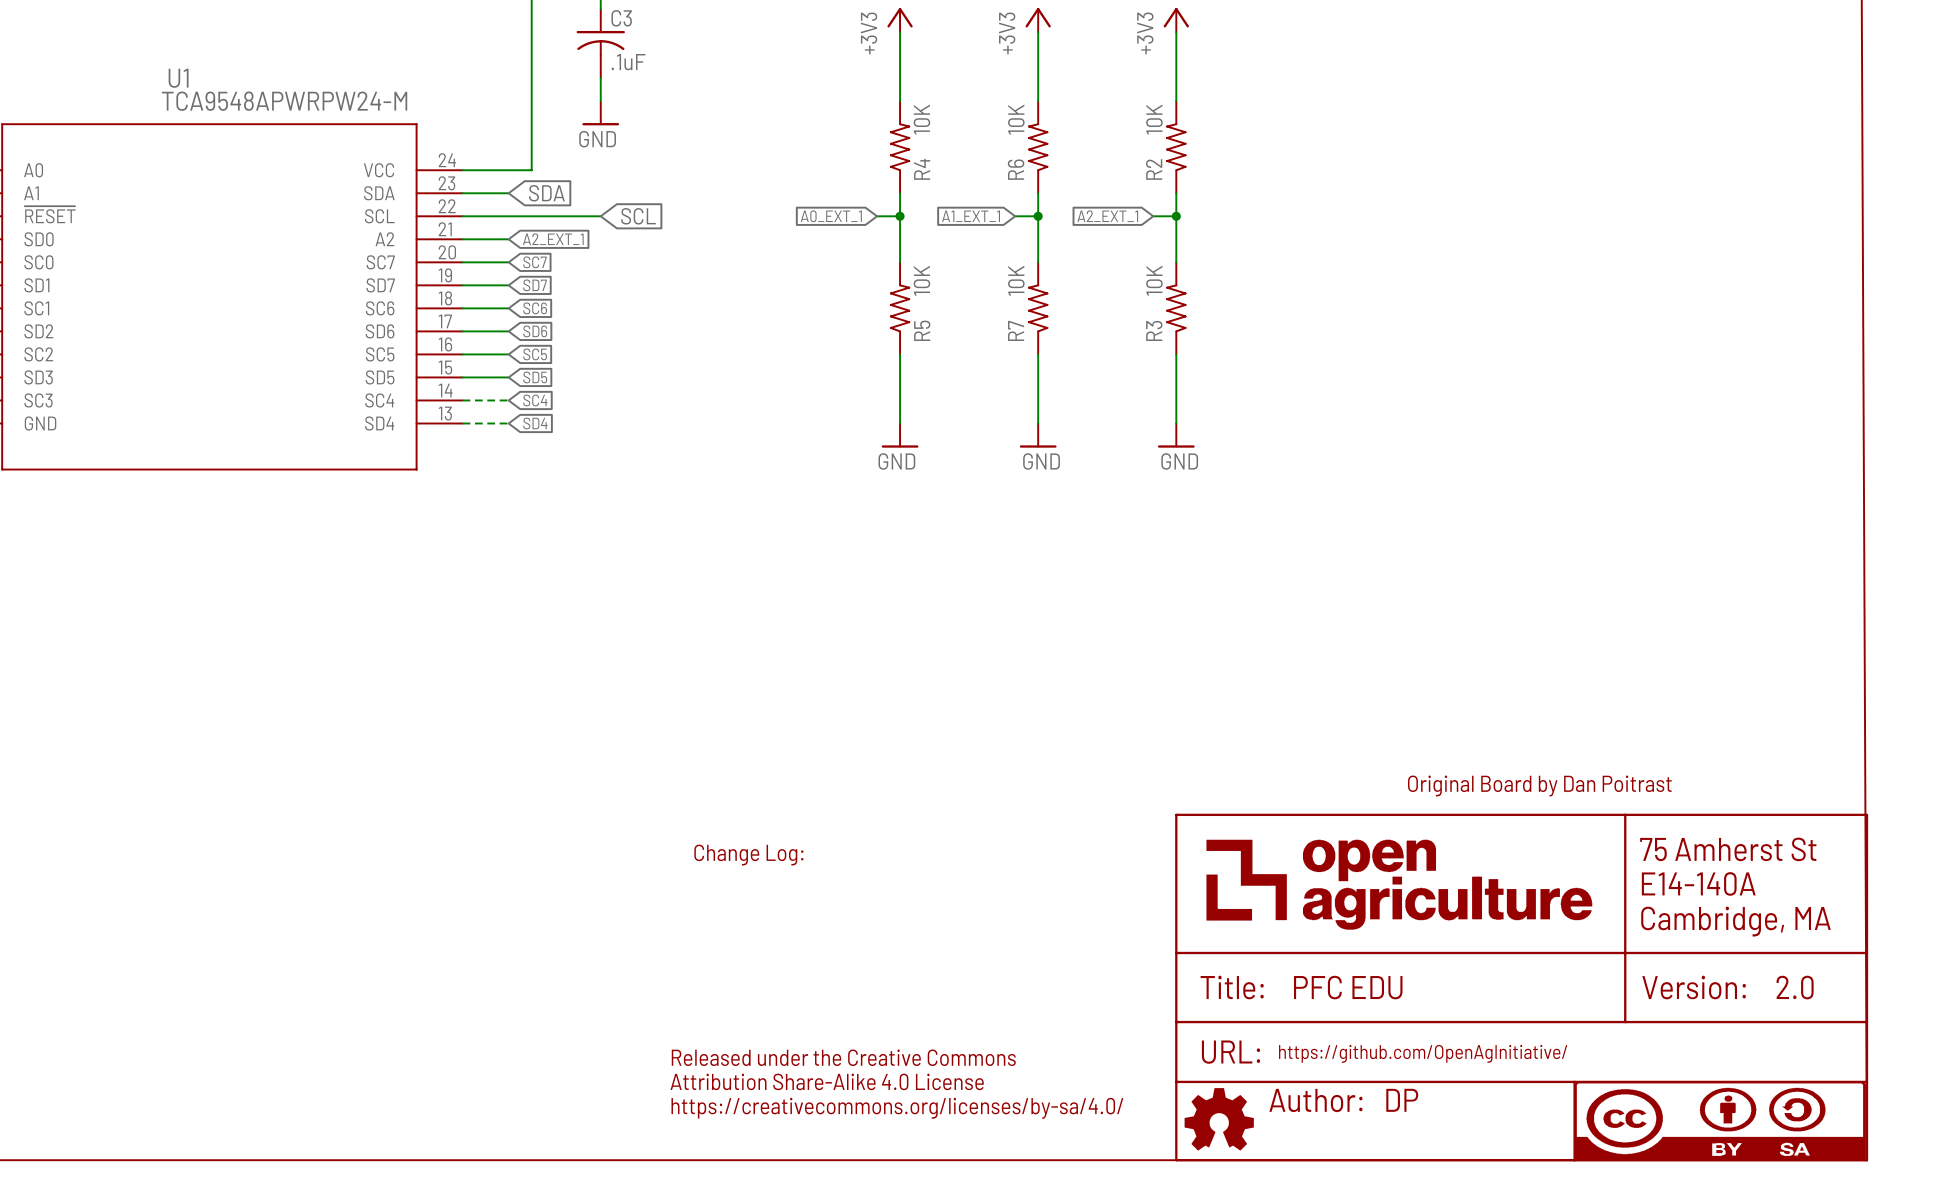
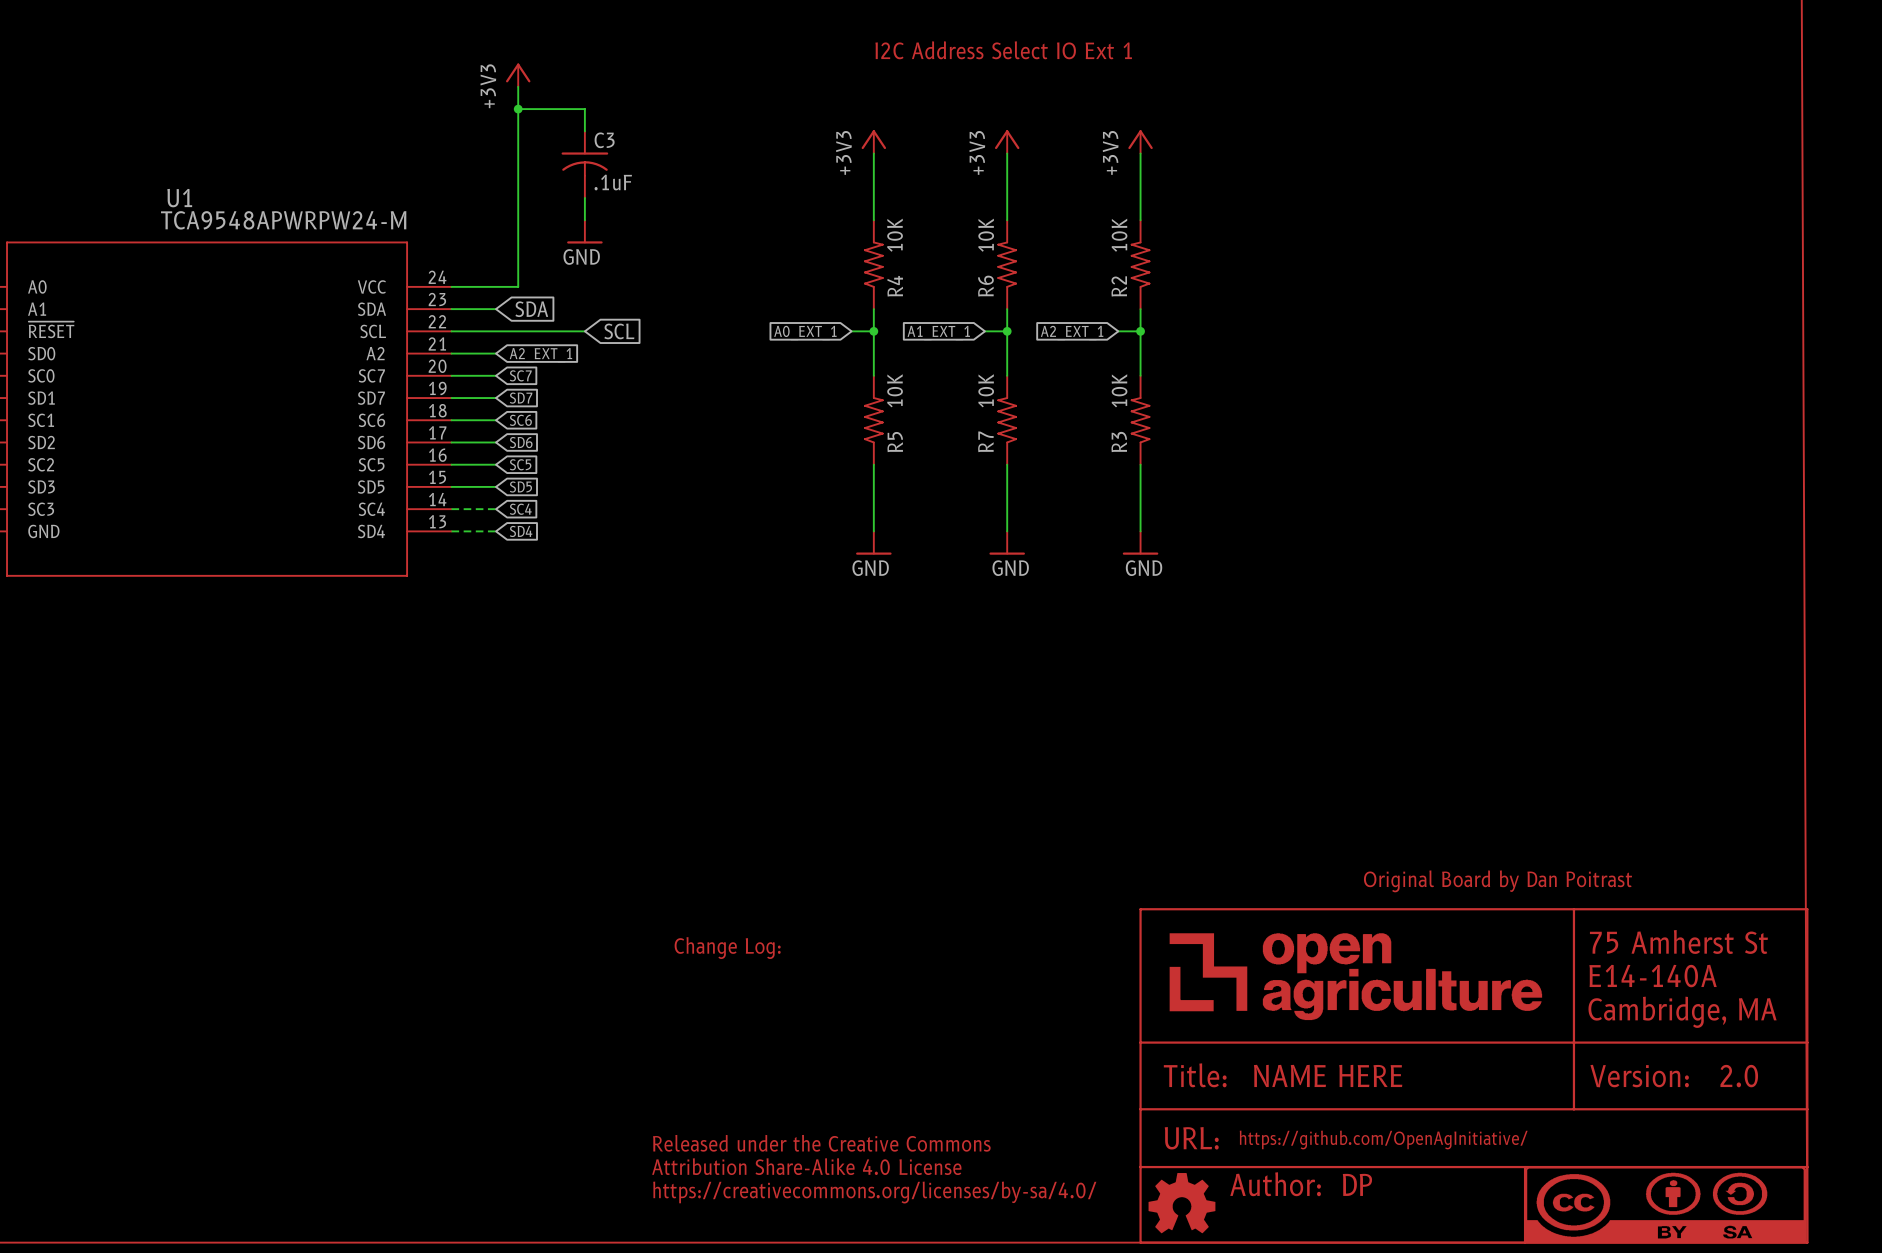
part text: PFC EDU (1348, 987) -> NAME HERE (1328, 1075)

